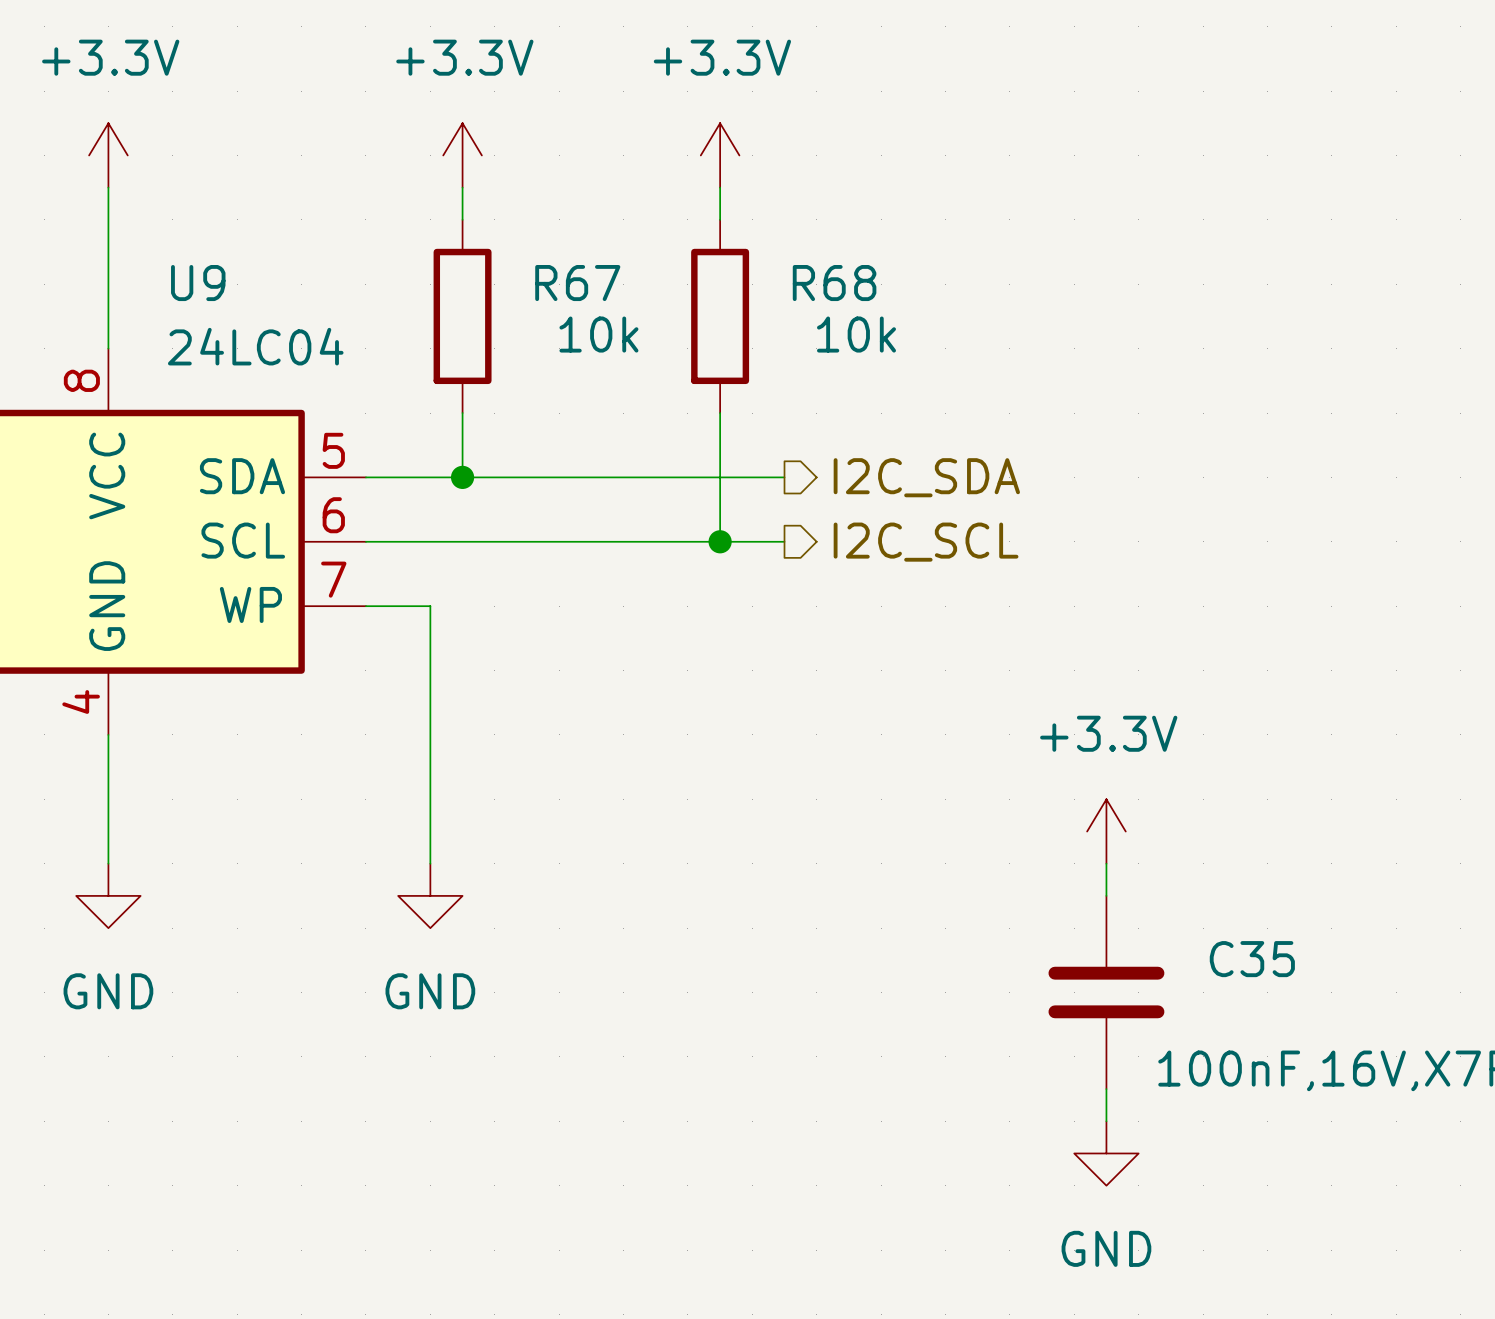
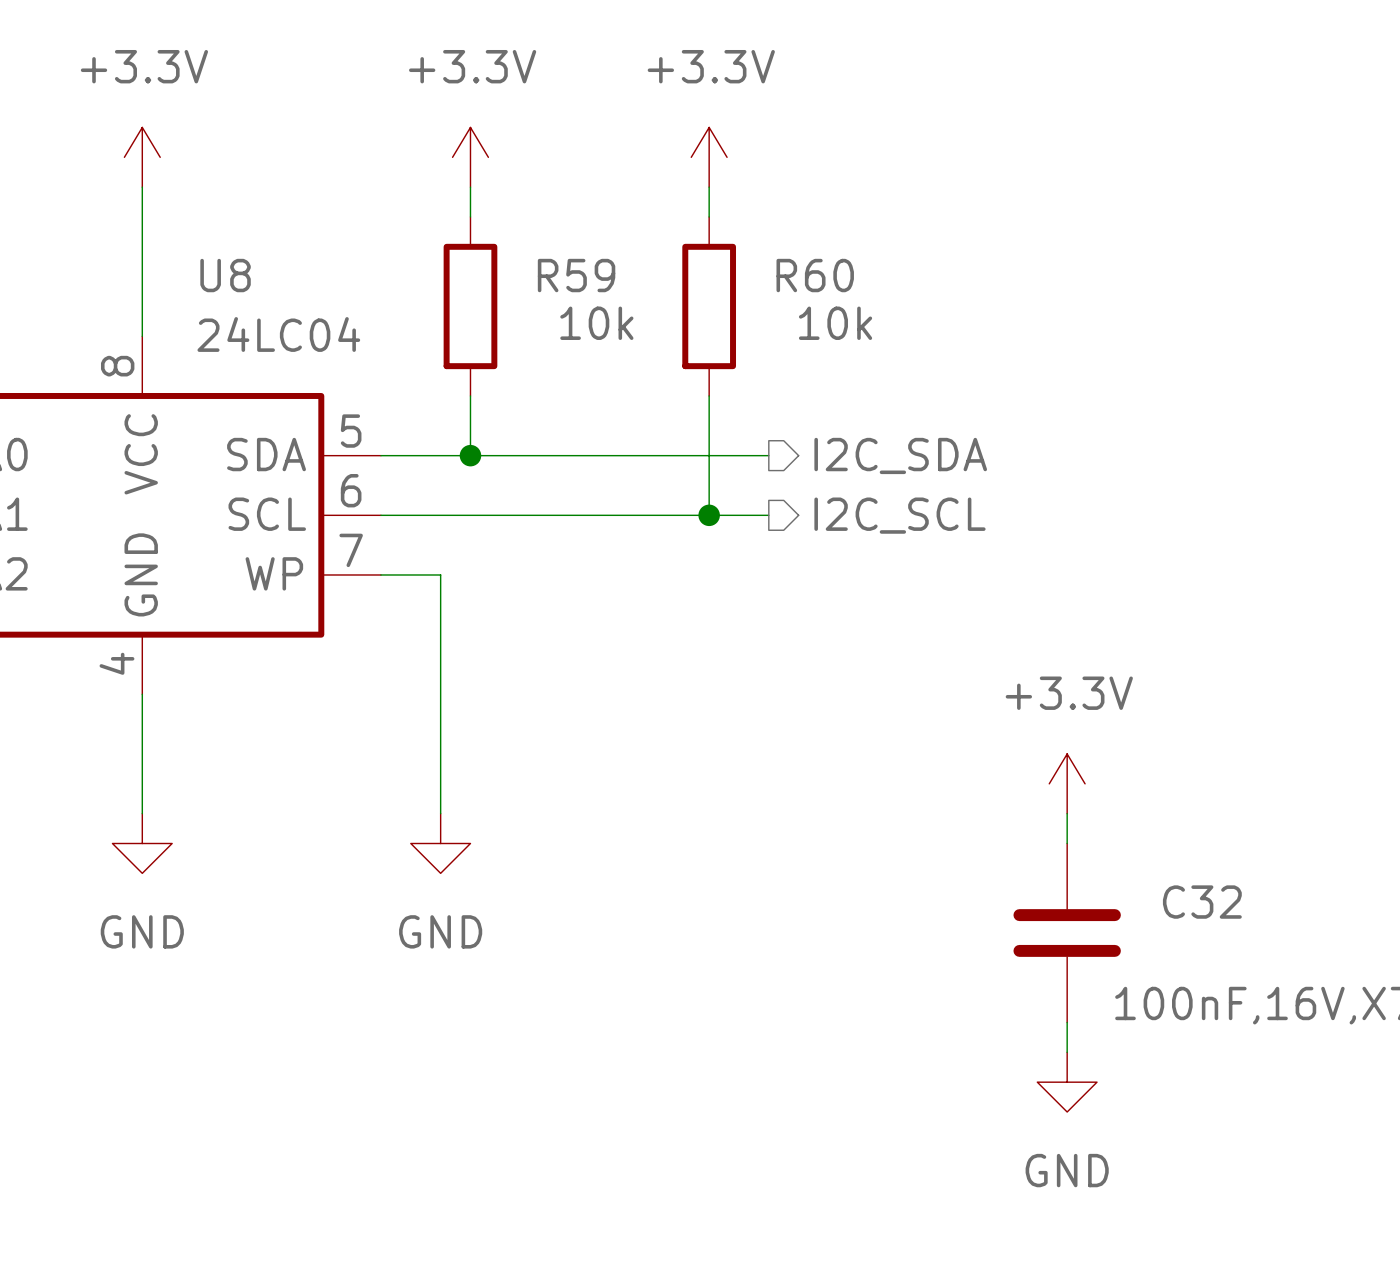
U9 name: U9 (198, 283) -> U8 (225, 275)
R67 name: R67 (577, 283) -> R59 (576, 275)
R68 name: R68 (834, 283) -> R60 (815, 275)
C35 name: C35 (1252, 959) -> C32 (1202, 902)

